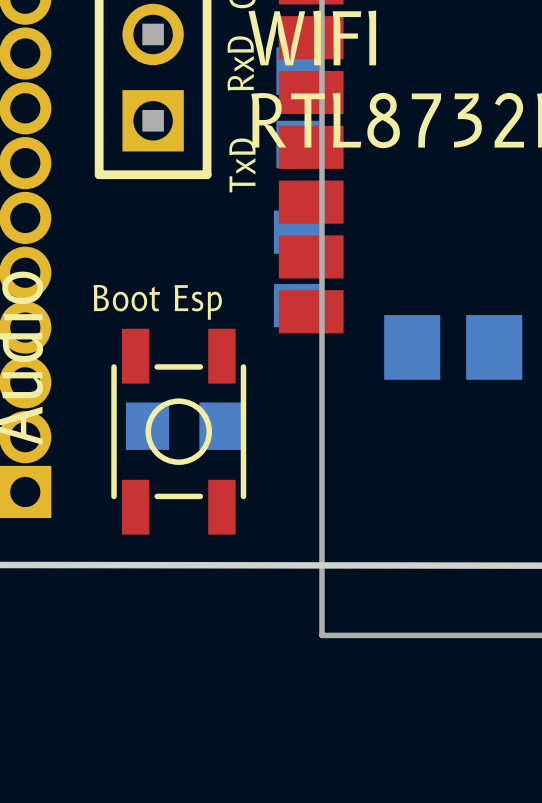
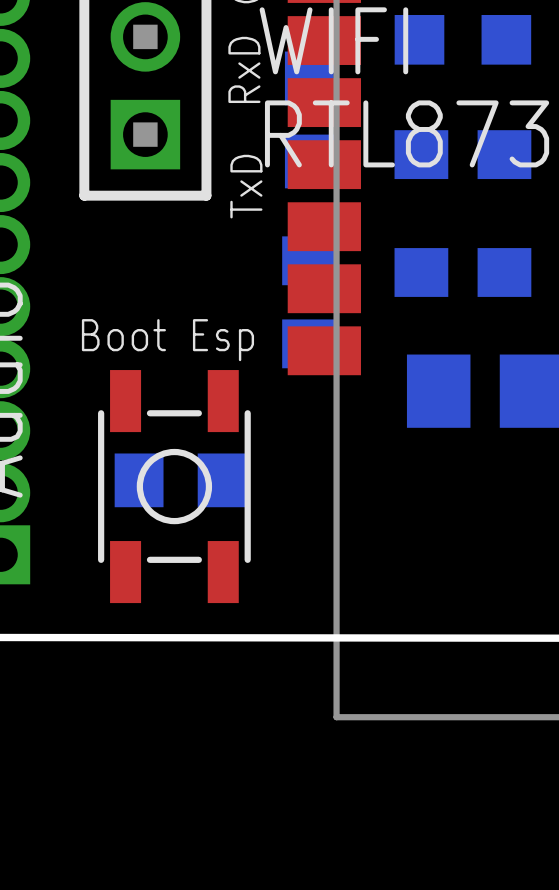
part: none -> (462, 39)
part: none -> (462, 154)
part: none -> (462, 272)

